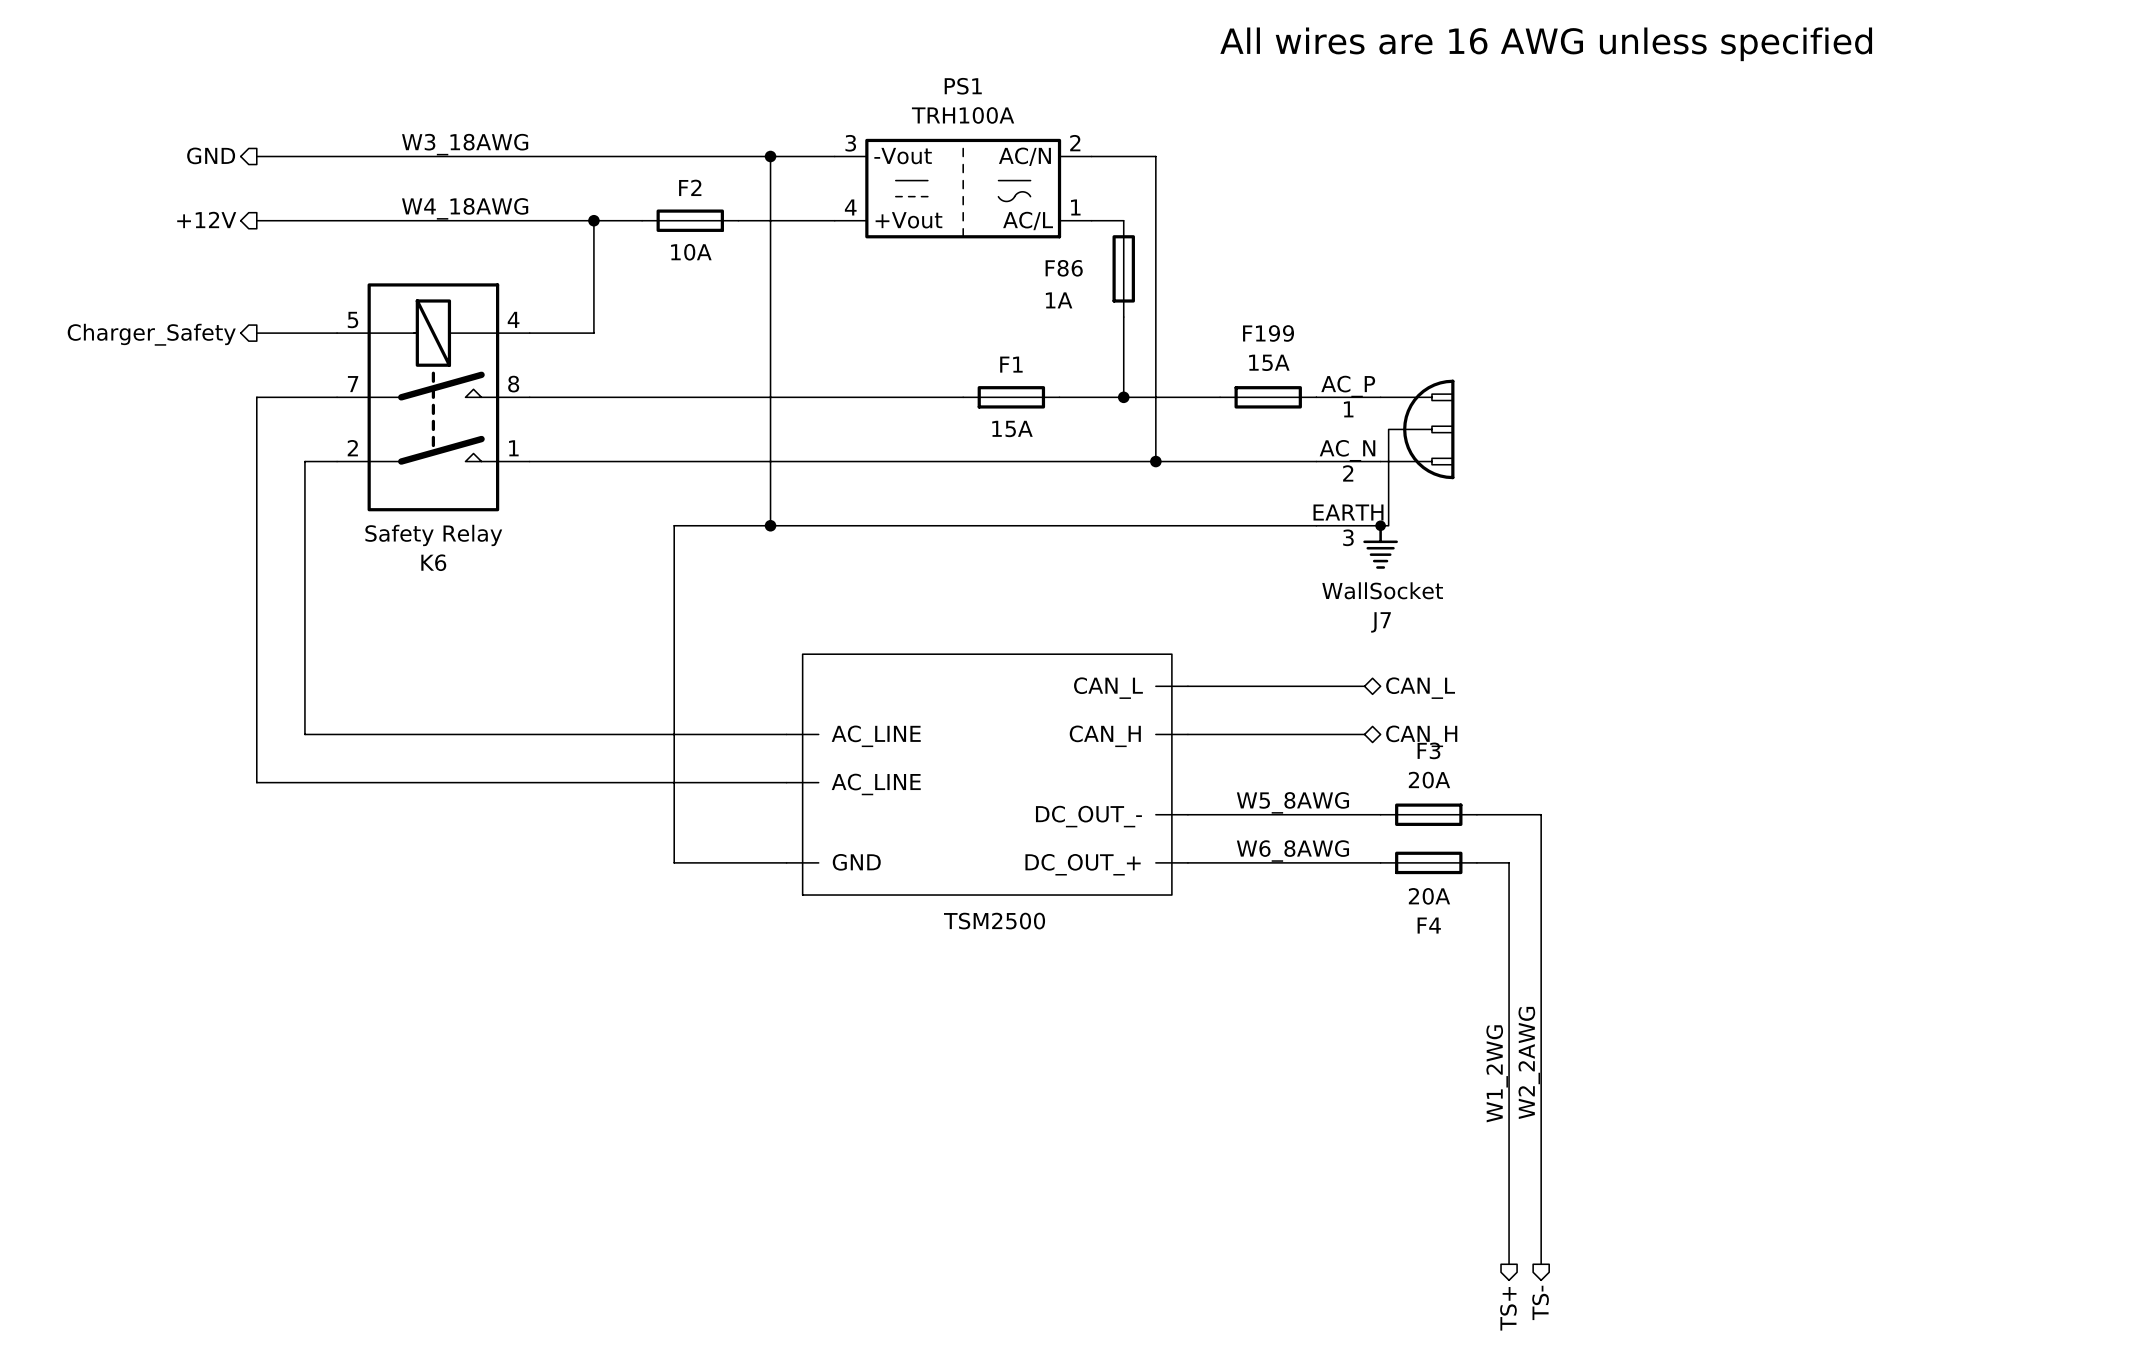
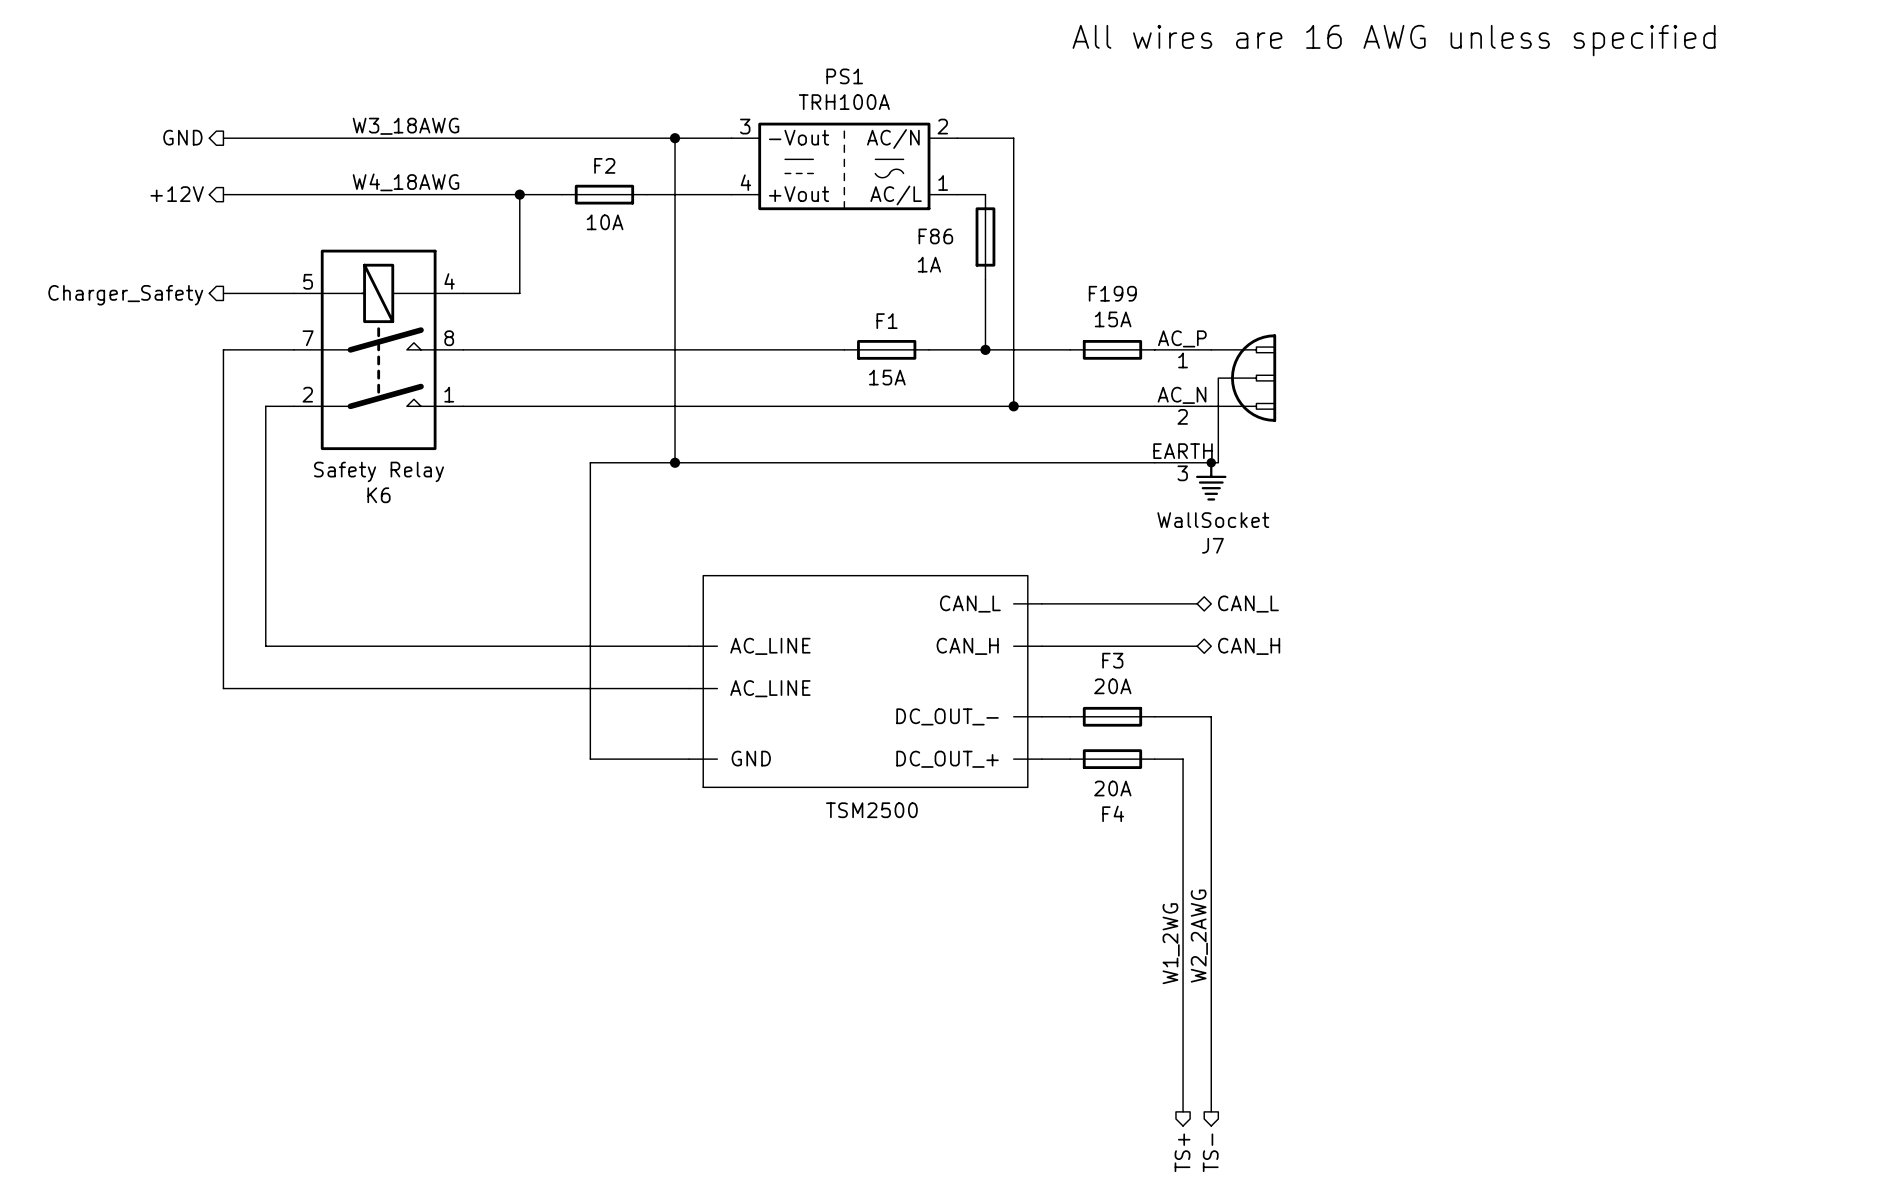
label: W5_8AWG (1292, 802) -> none
wire: none -> (1211, 716) (1211, 1111)
F3 position: (1428, 814) -> (1112, 716)
wire: (1476, 814) (1541, 814) (1541, 1264) -> none
label: W6_8AWG (1292, 851) -> none
wire: (1348, 862) (1380, 862) -> (1183, 759) (1183, 1111)
F4 position: (1428, 862) -> (1112, 759)
wire: (1476, 862) (1509, 862) (1509, 1264) -> none
label position: W2_2AWG (1529, 1062) -> W2_2AWG (1199, 936)
label position: W1_2WG (1497, 1073) -> W1_2WG (1171, 943)
hierarchical label position: TS- (1540, 1302) -> TS- (1210, 1152)
hierarchical label position: TS+ (1508, 1308) -> TS+ (1182, 1152)

